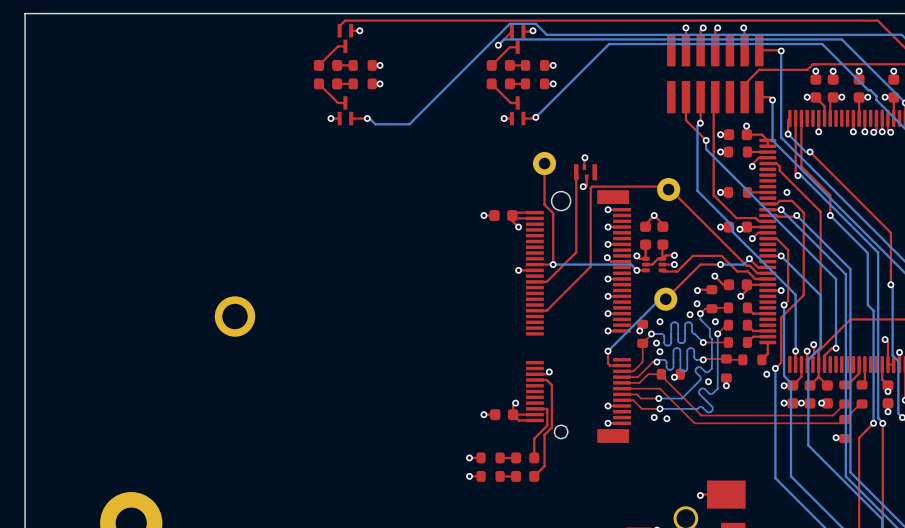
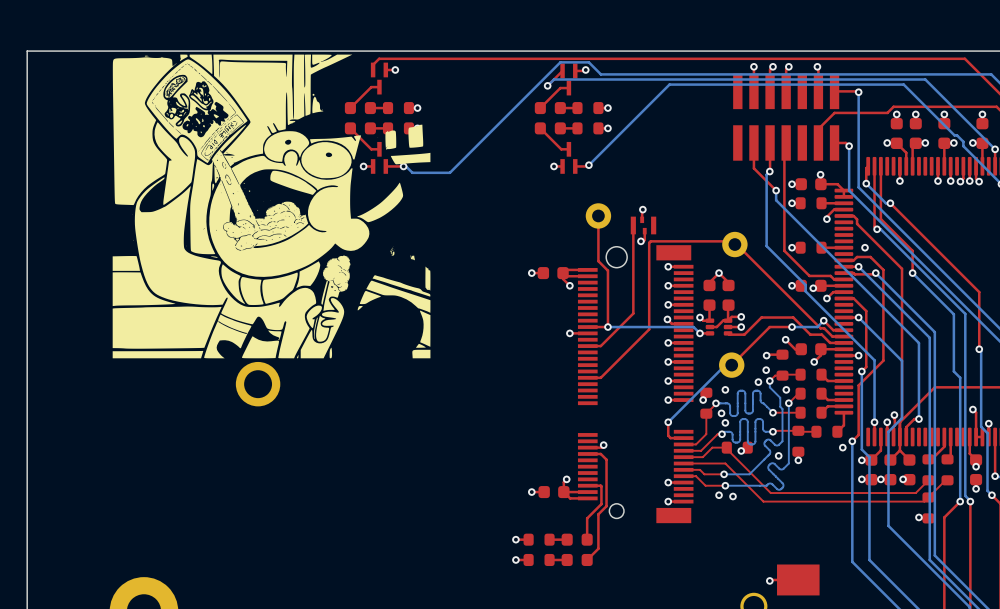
drawing: none -> [112, 54, 431, 359]

